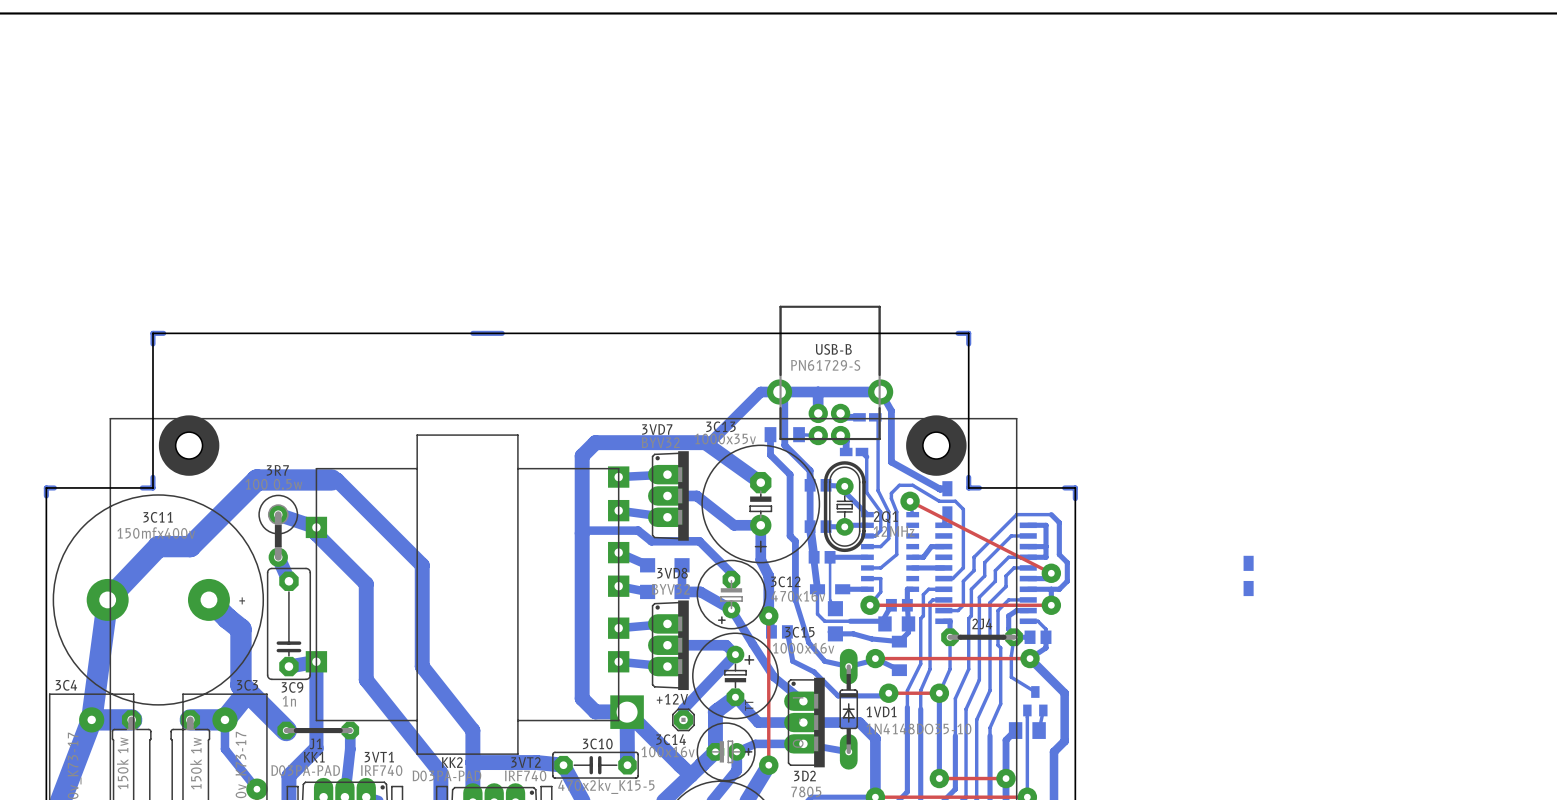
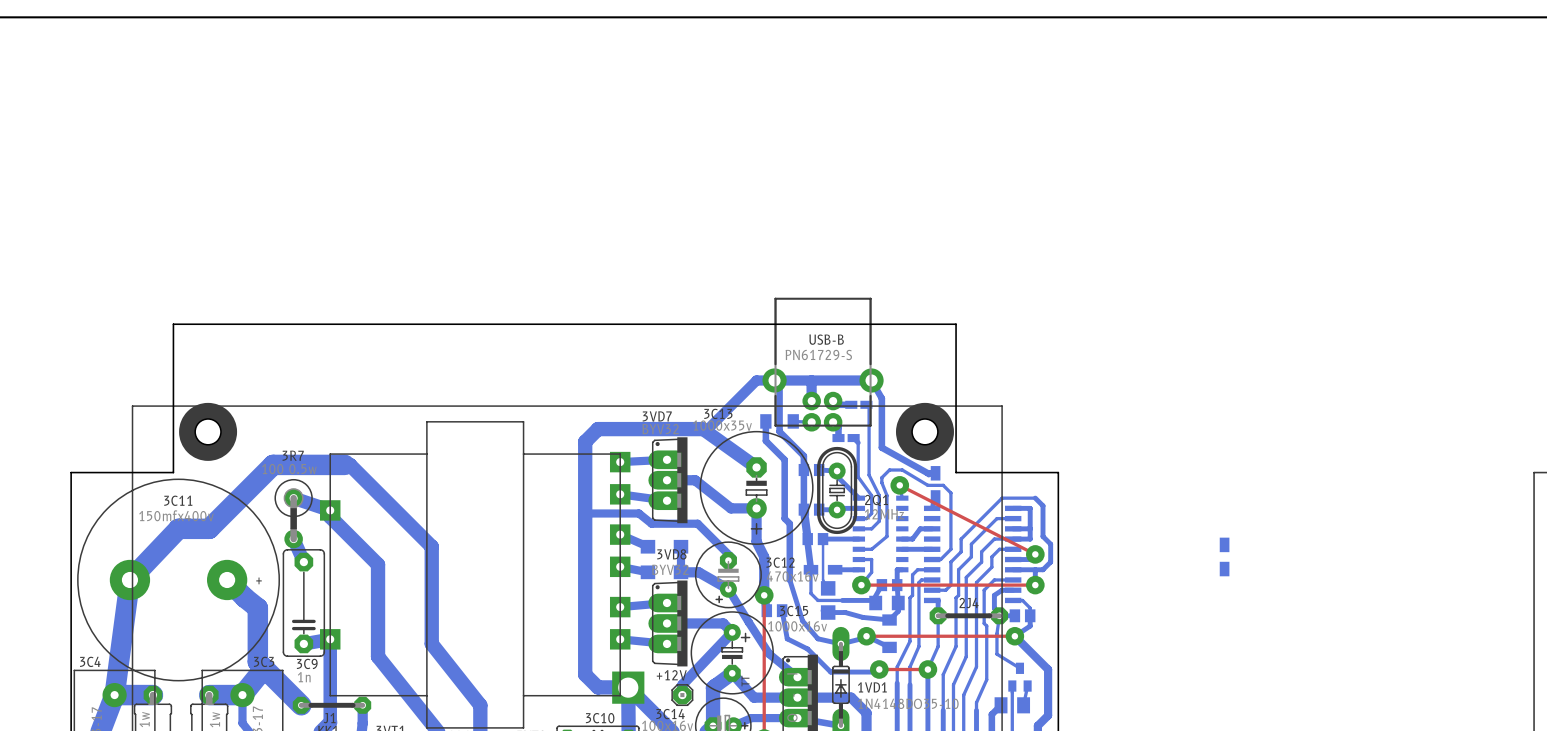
bottom track: (163, 333) (152, 333) (152, 344) -> none
bottom track: (472, 333) (502, 333) -> none
bottom track: (958, 333) (968, 333) (968, 344) -> none
bottom track: (152, 477) (152, 487) (142, 487) -> none
bottom track: (968, 477) (968, 487) (979, 487) -> none
bottom track: (54, 487) (46, 487) (46, 495) -> none
bottom track: (1064, 487) (1075, 487) (1075, 498) -> none

